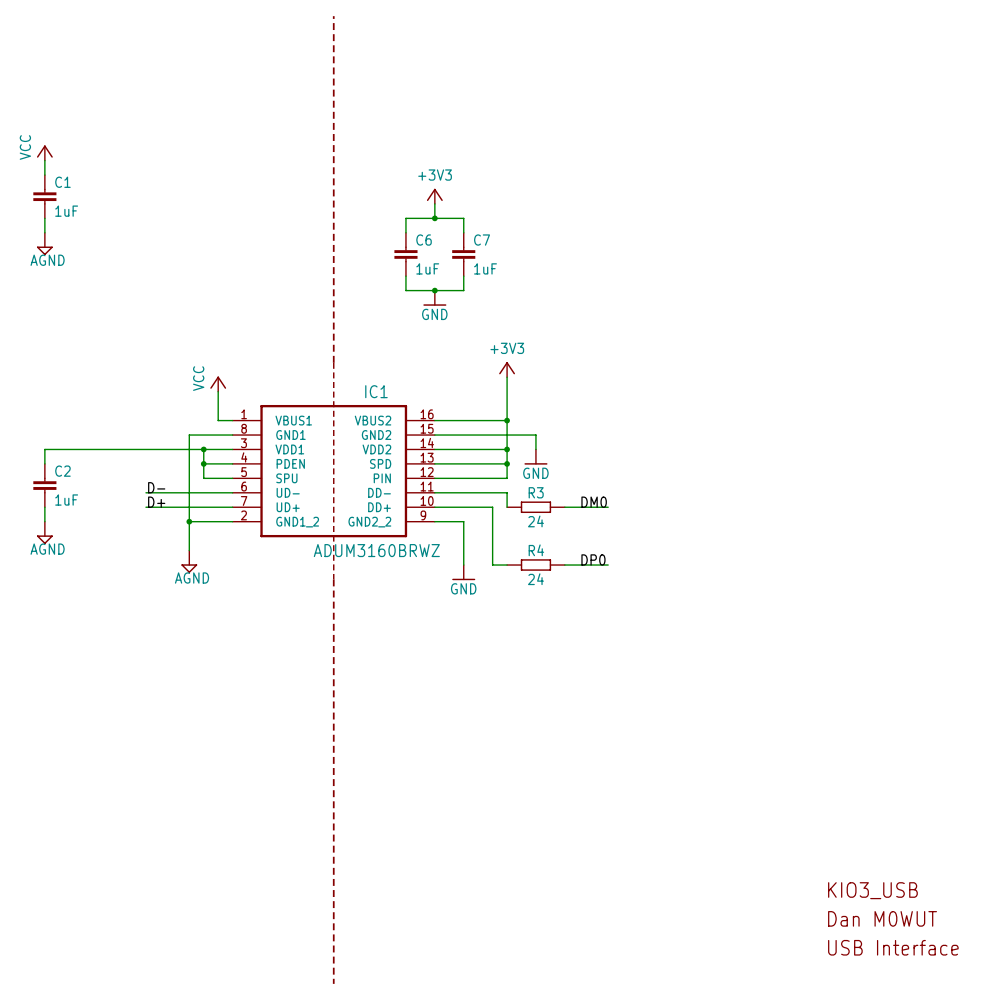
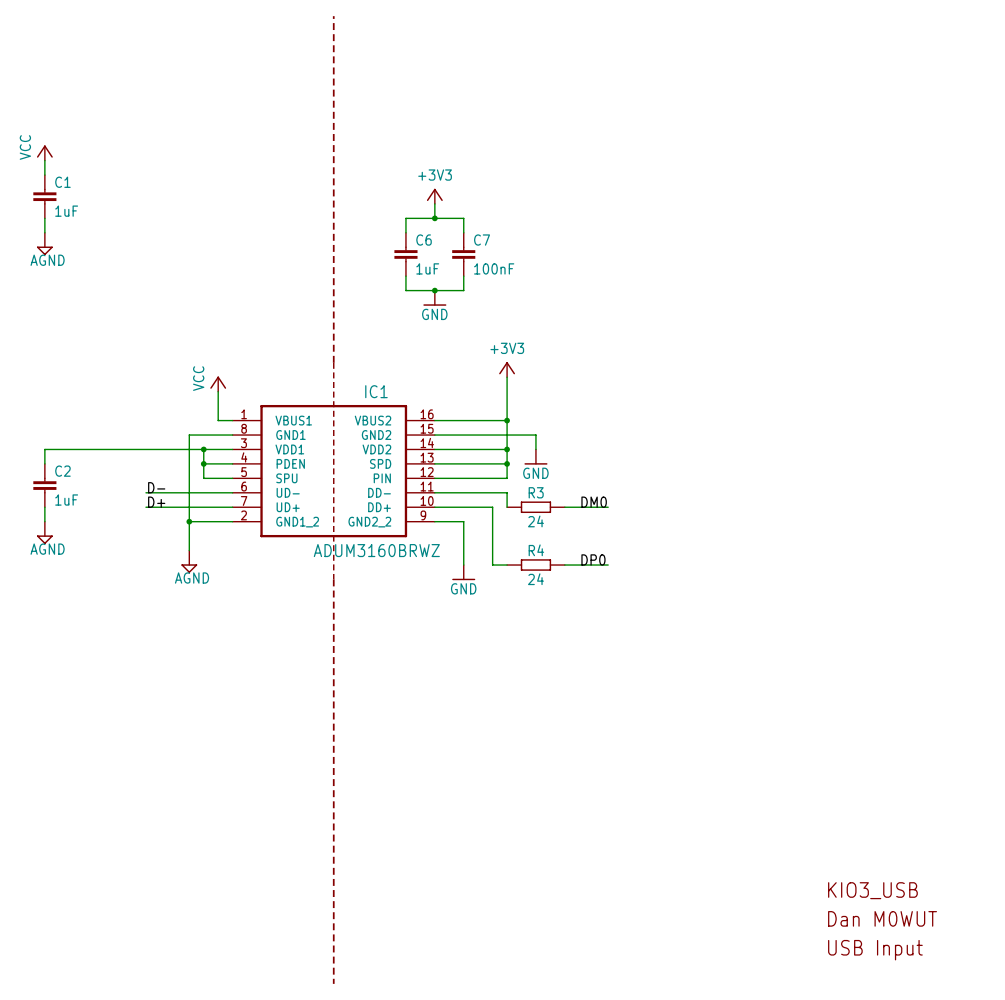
C7 value: 1uF (485, 268) -> 100nF (494, 268)
text: USB Interface (893, 947) -> USB Input (875, 950)

